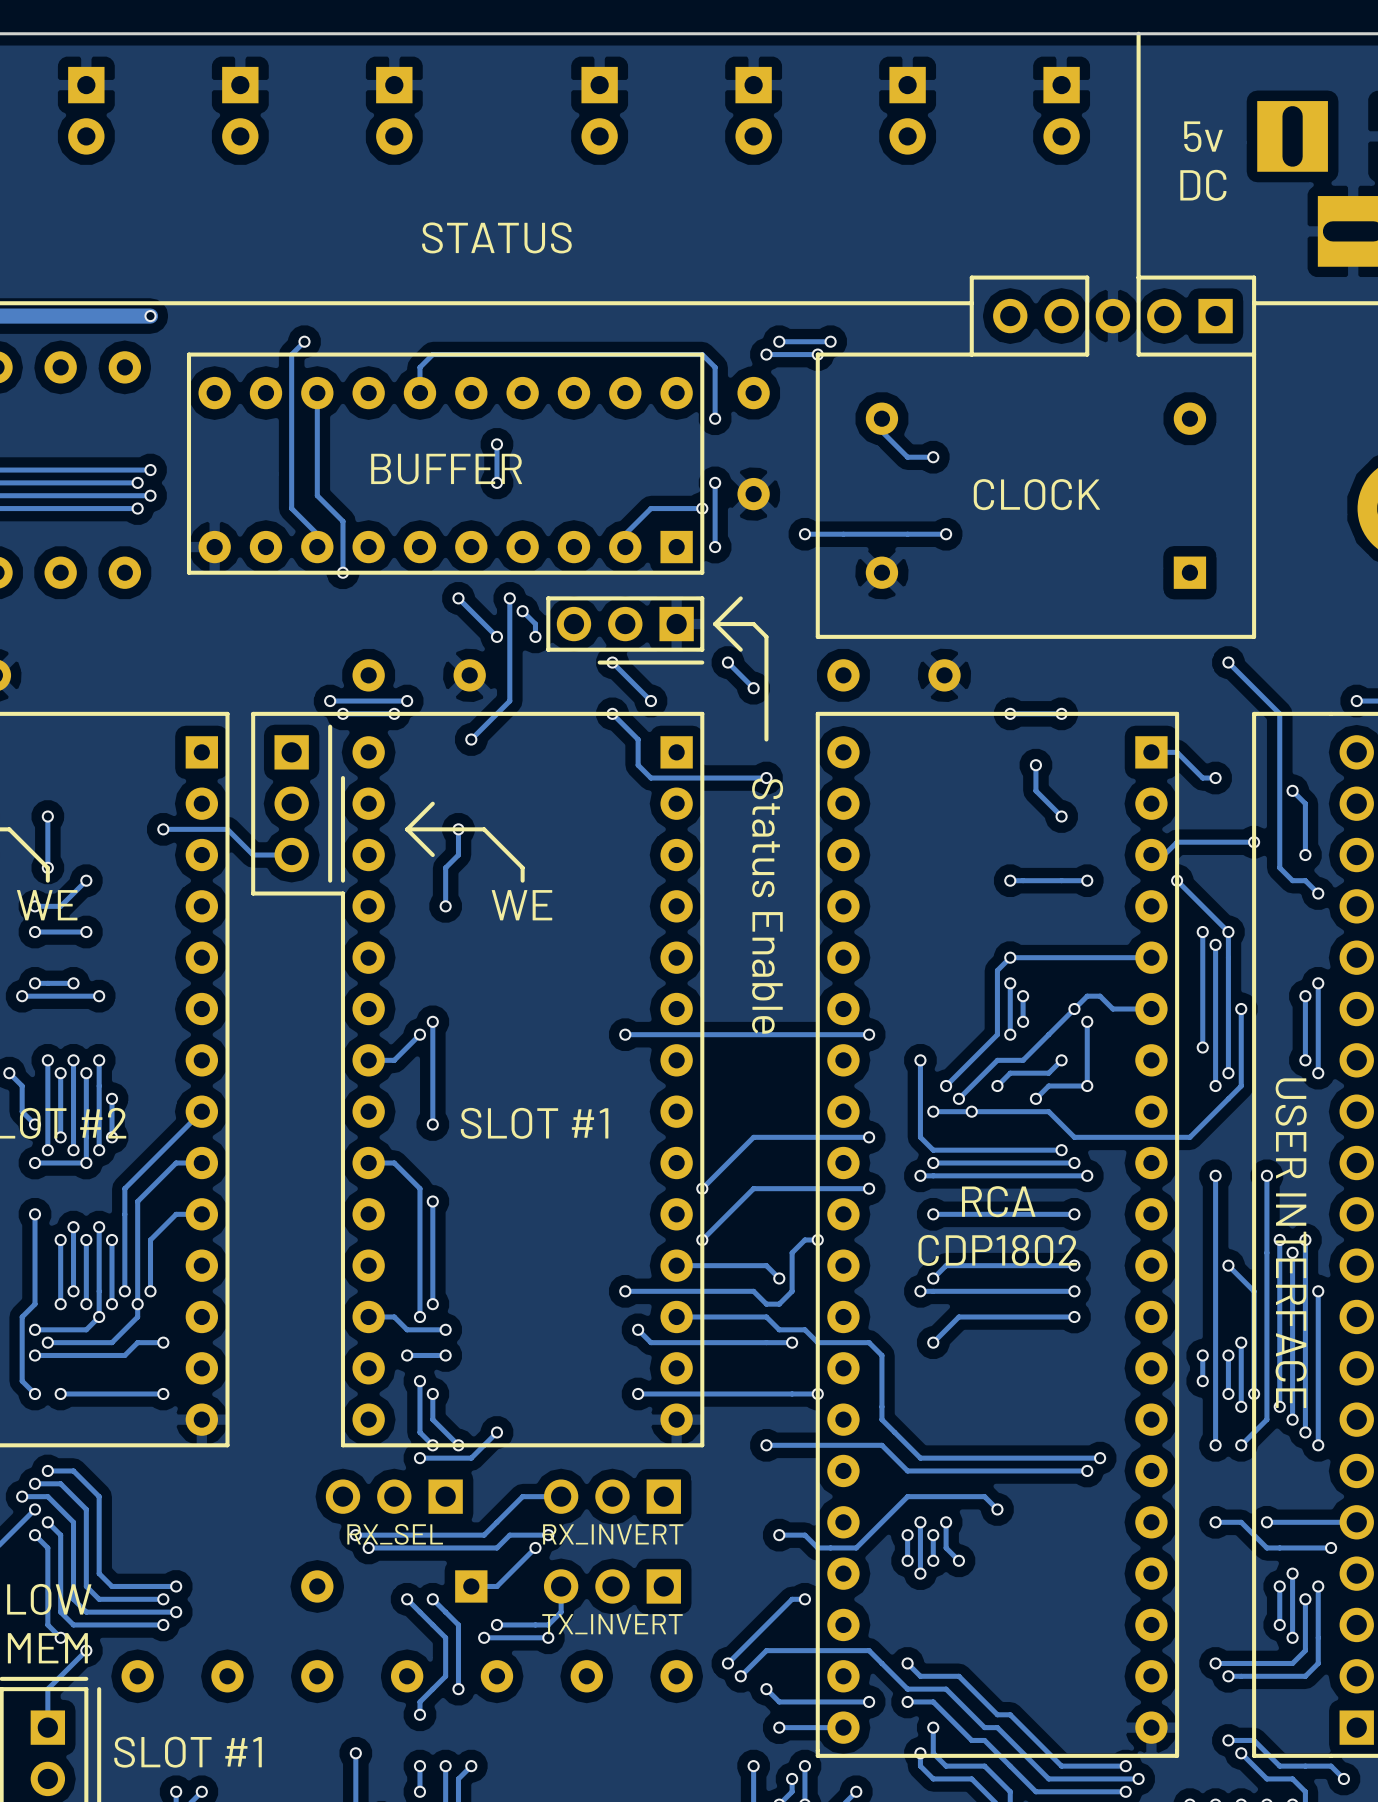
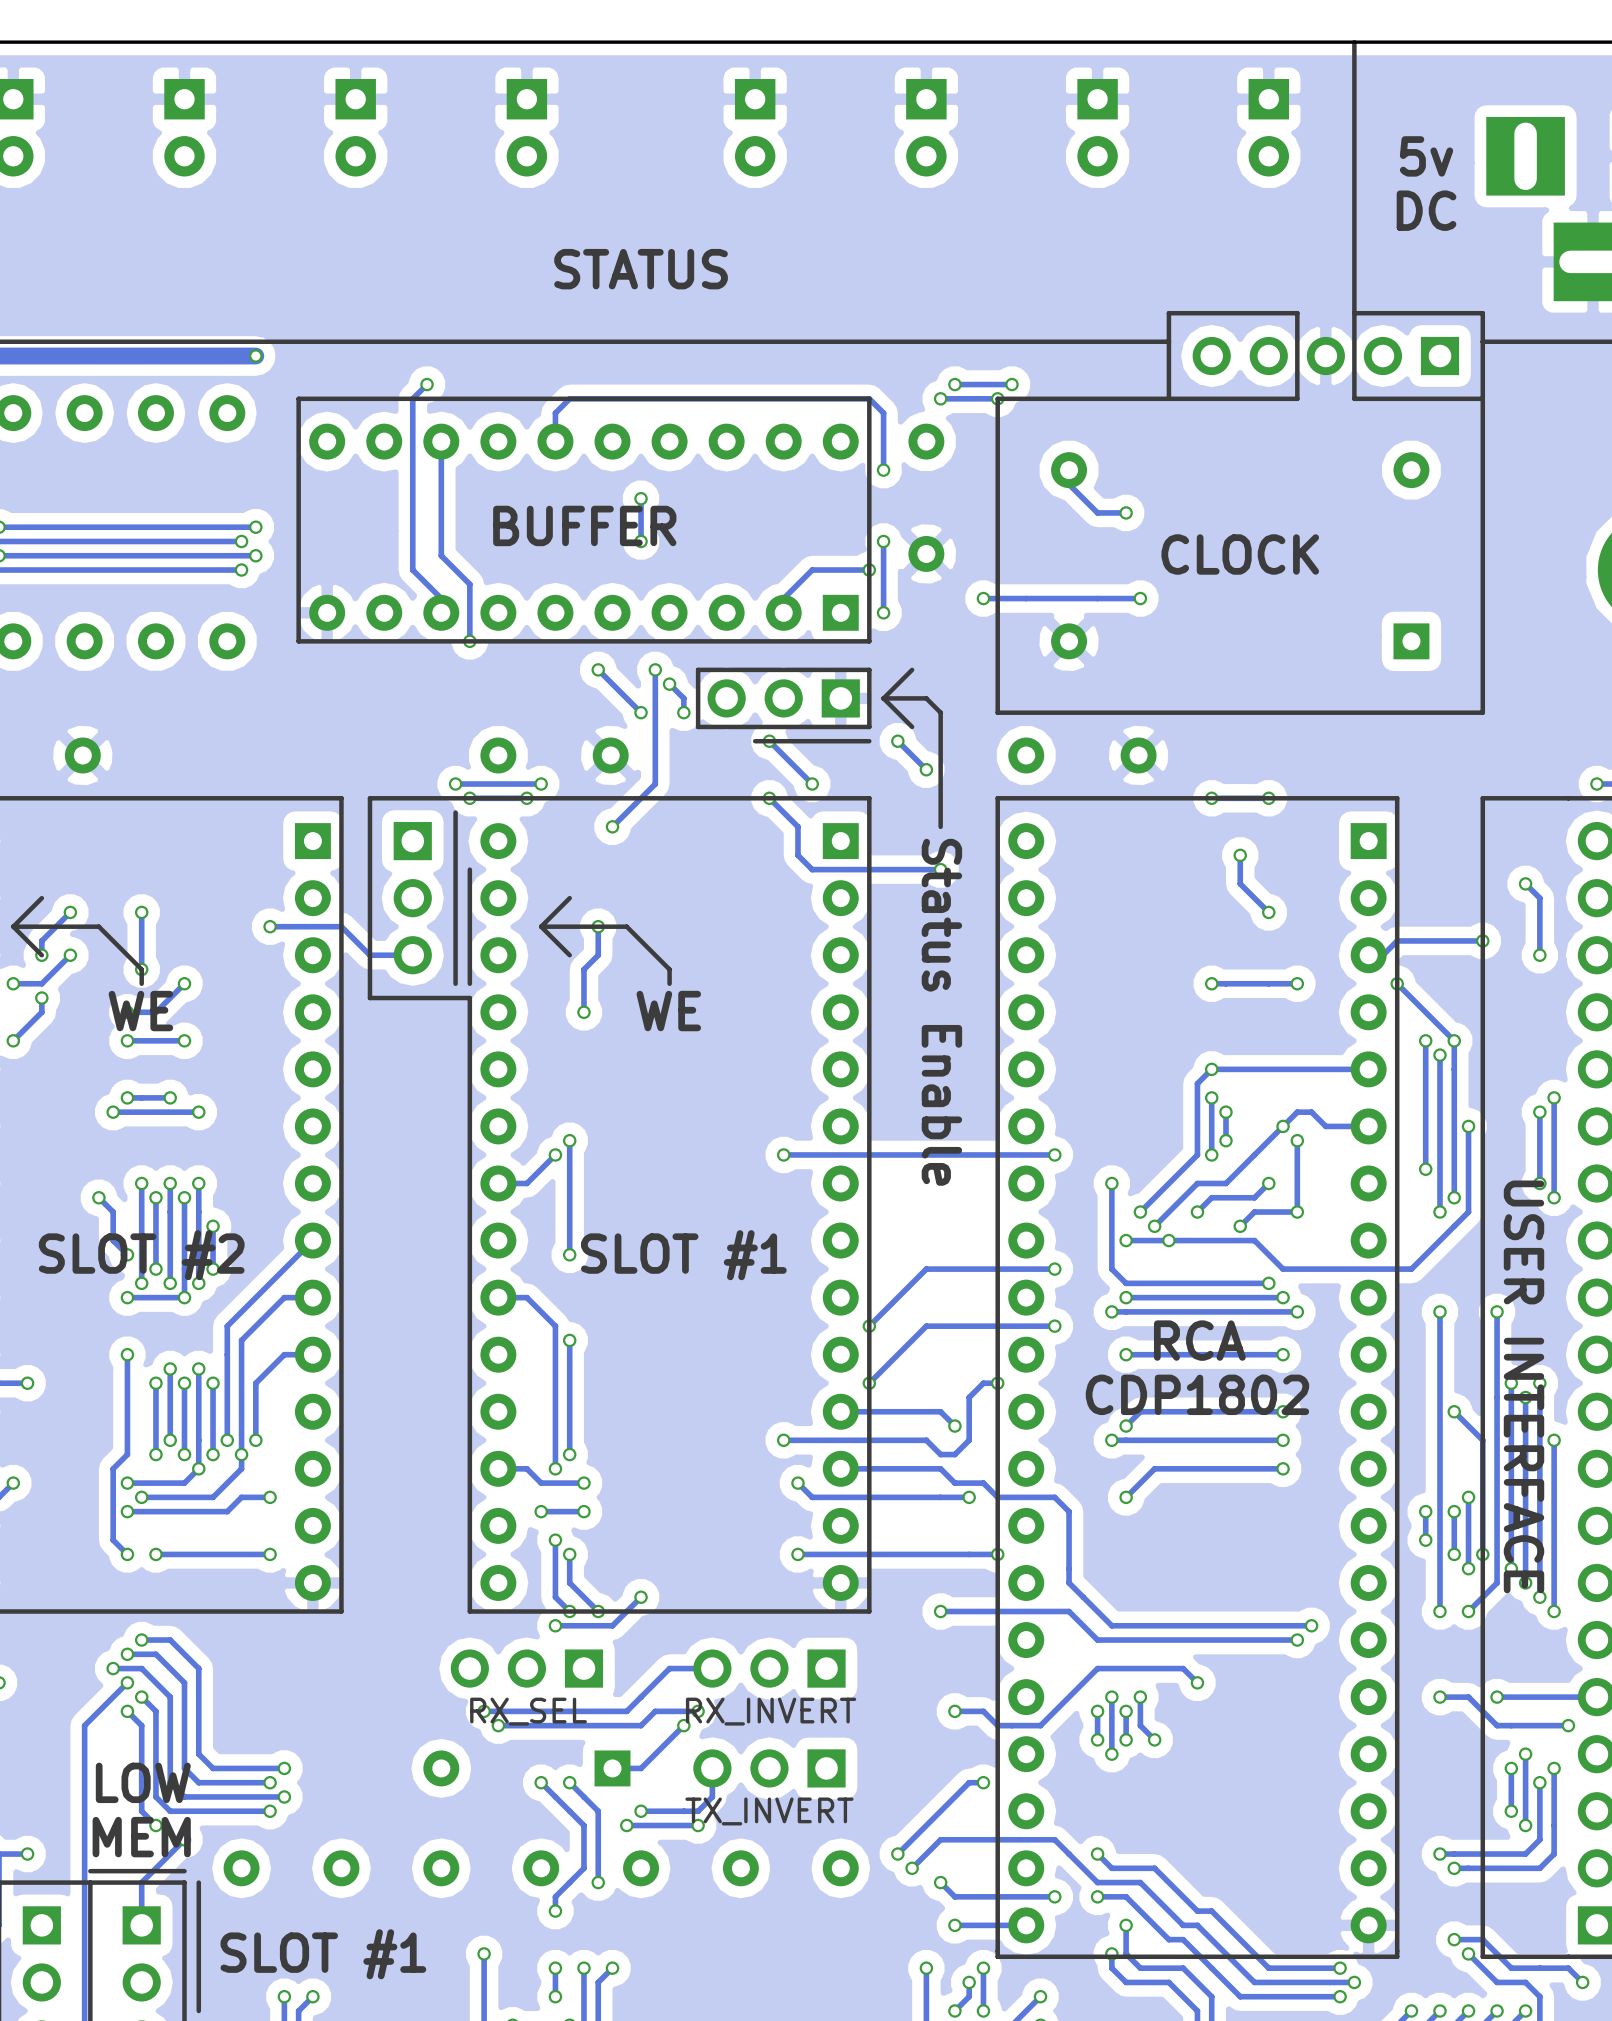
track: (1228, 662) (1279, 713) (1279, 867) (1292, 880) (1305, 880) (1318, 893) -> none
via: (1228, 662) -> none
track: (1151, 752) (1177, 752) (1202, 778) (1215, 778) -> none
via: (1215, 778) -> none
via: (1318, 893) -> none

